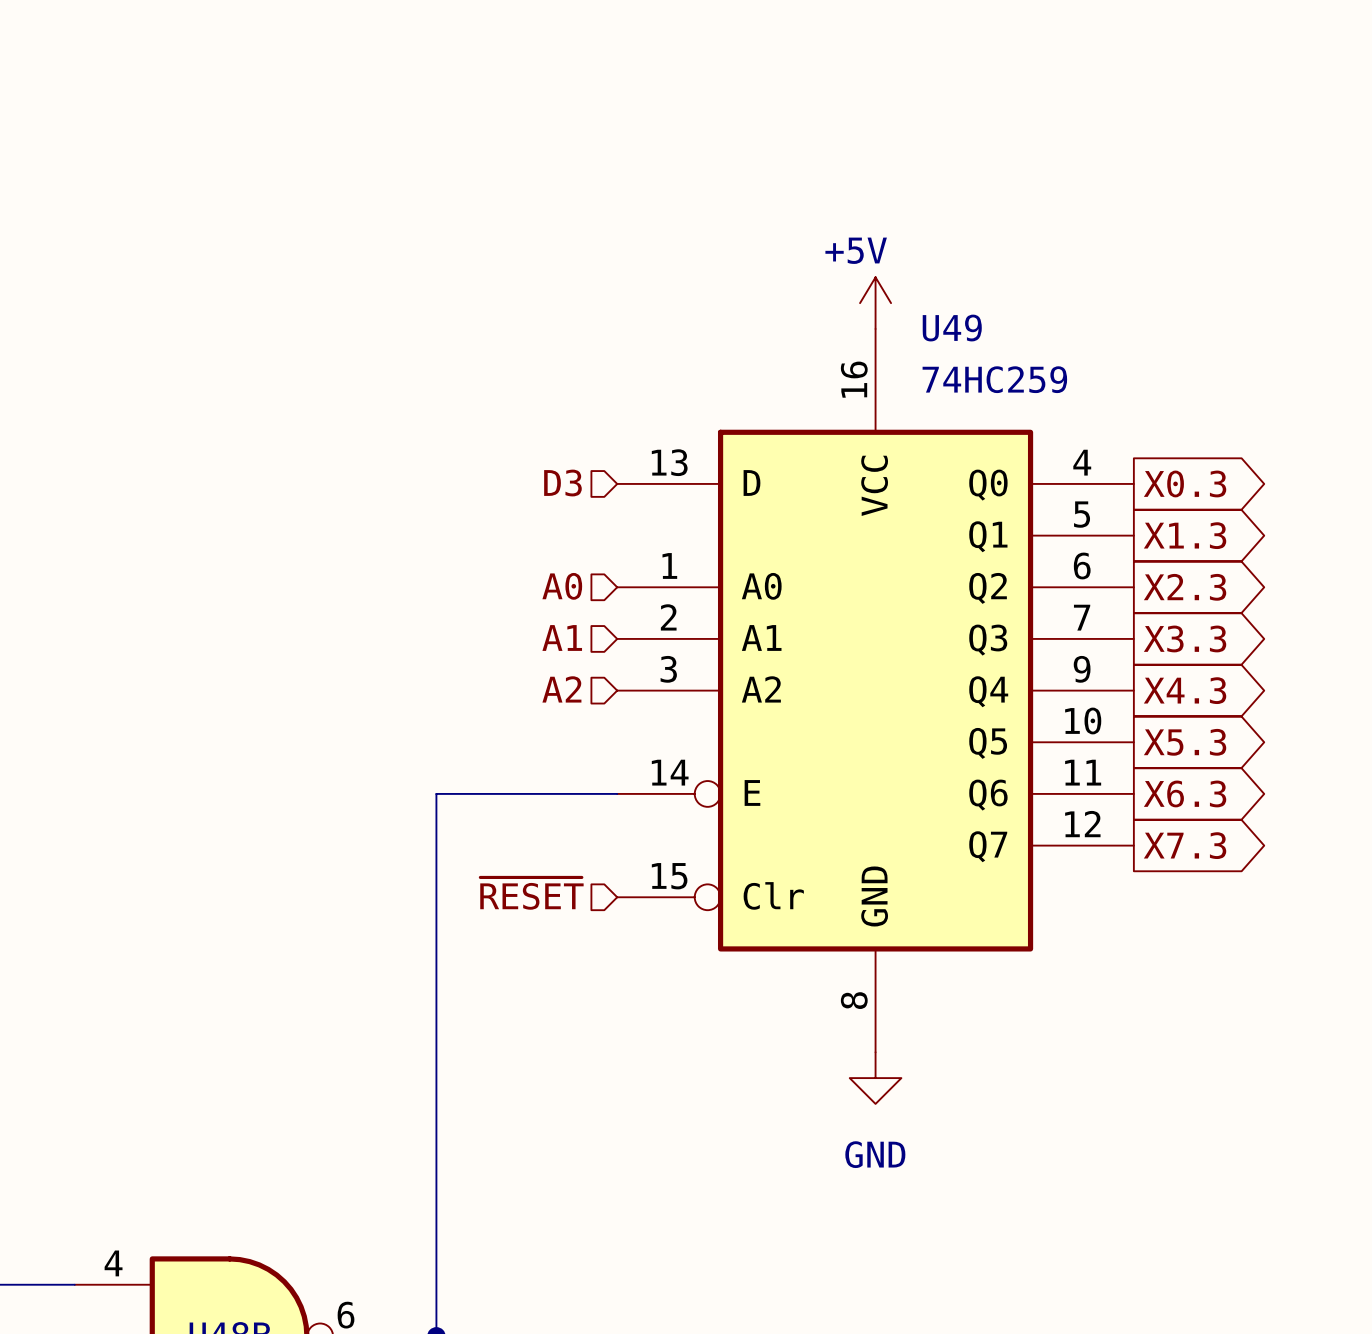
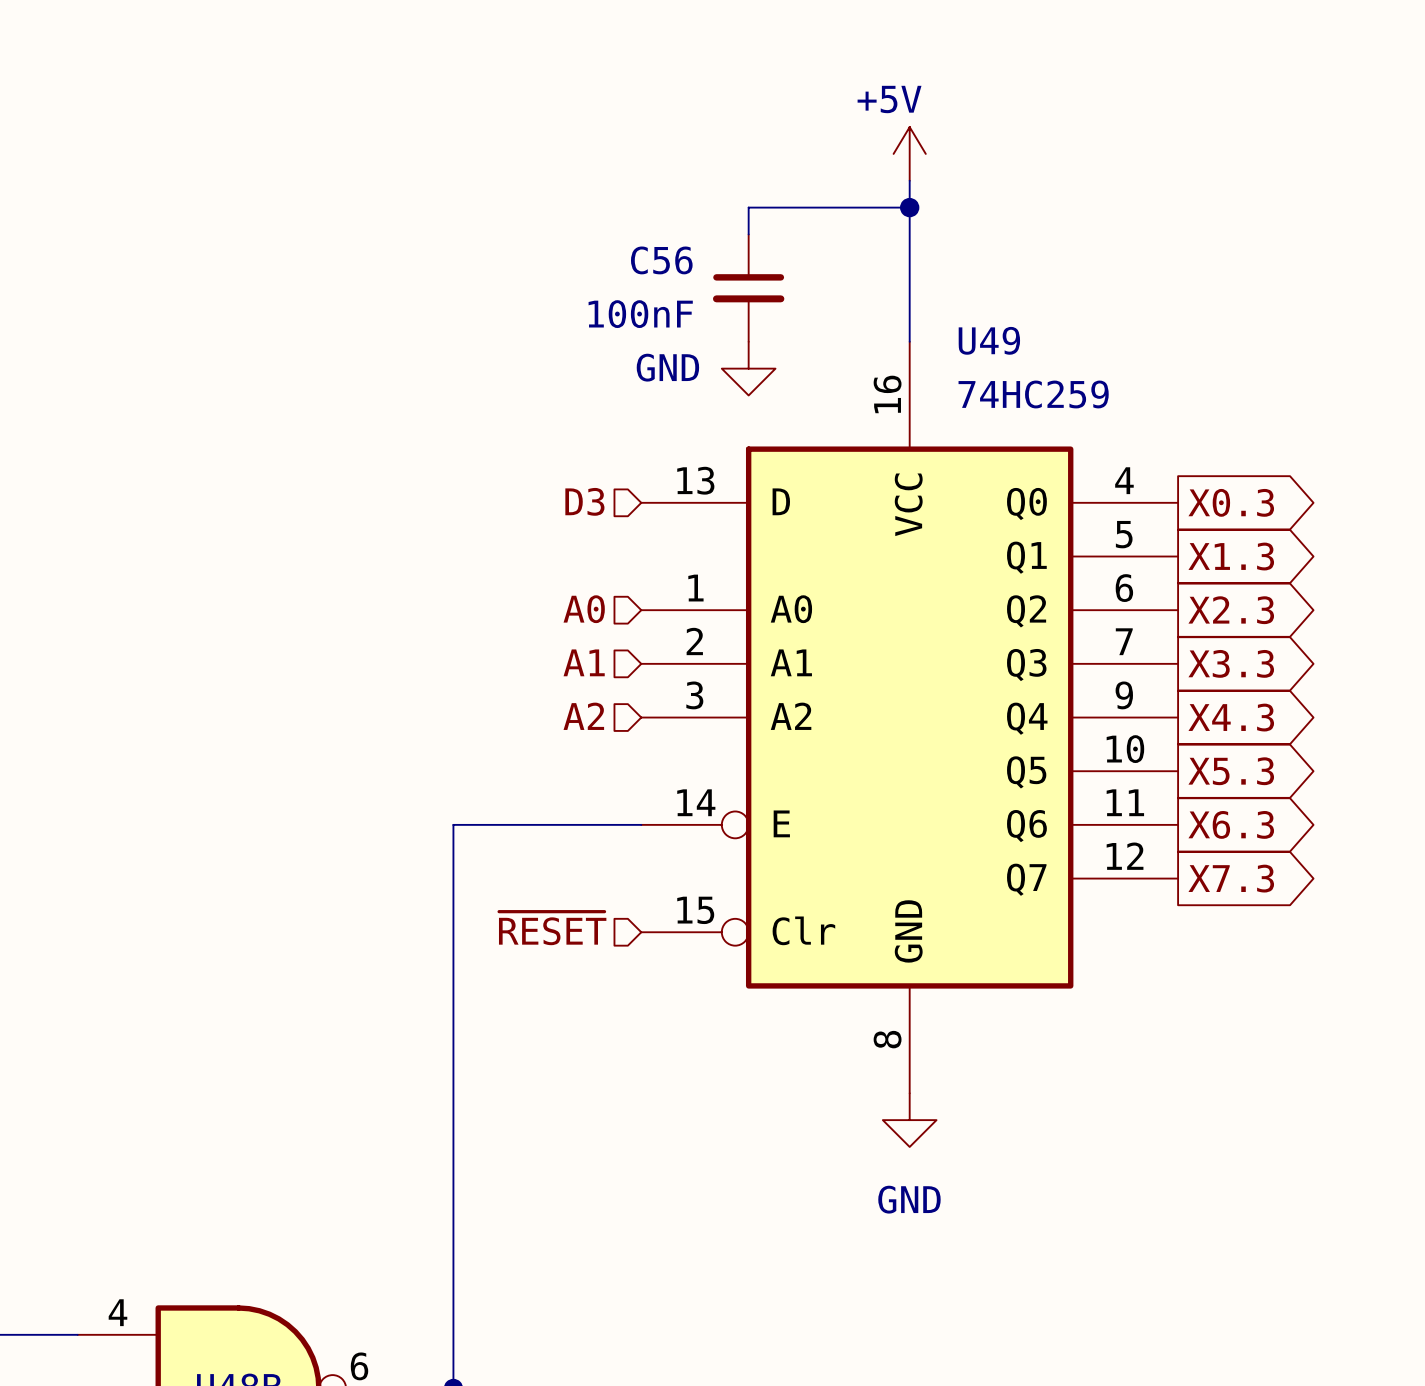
wire: none -> (909, 180) (909, 341)
wire: none -> (909, 207) (748, 207) (748, 234)
junction: none -> (909, 207)
C56: none -> 100nF (748, 288)
power symbol position: +5V (875, 303) -> +5V (909, 153)
power symbol: none -> GND (748, 368)

